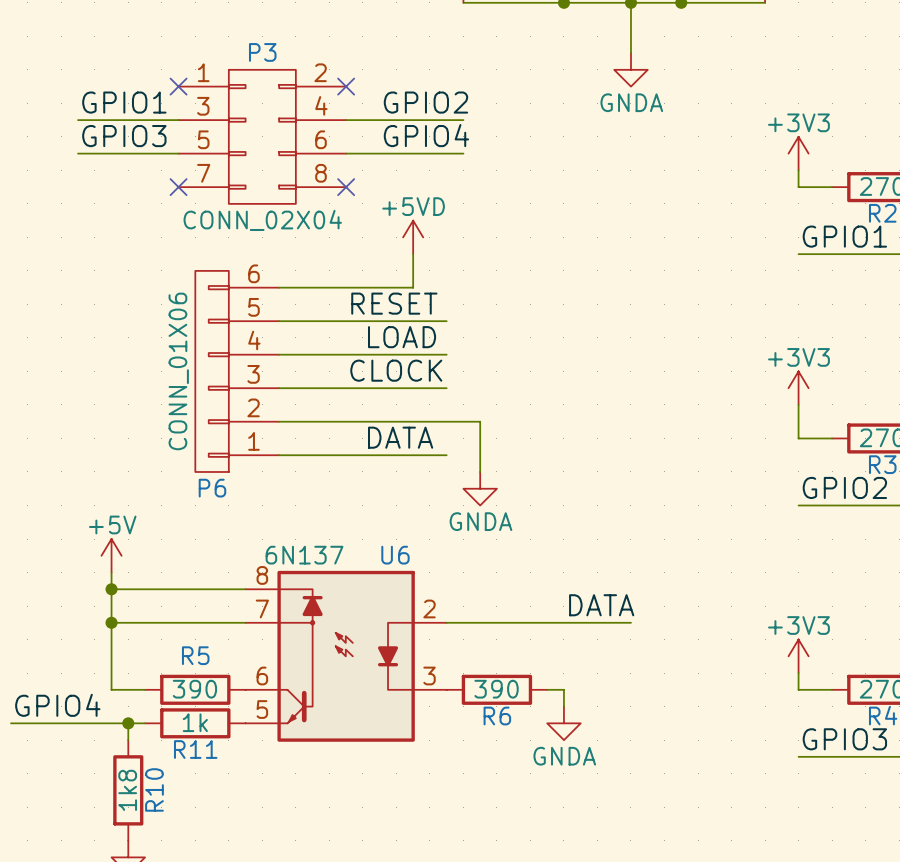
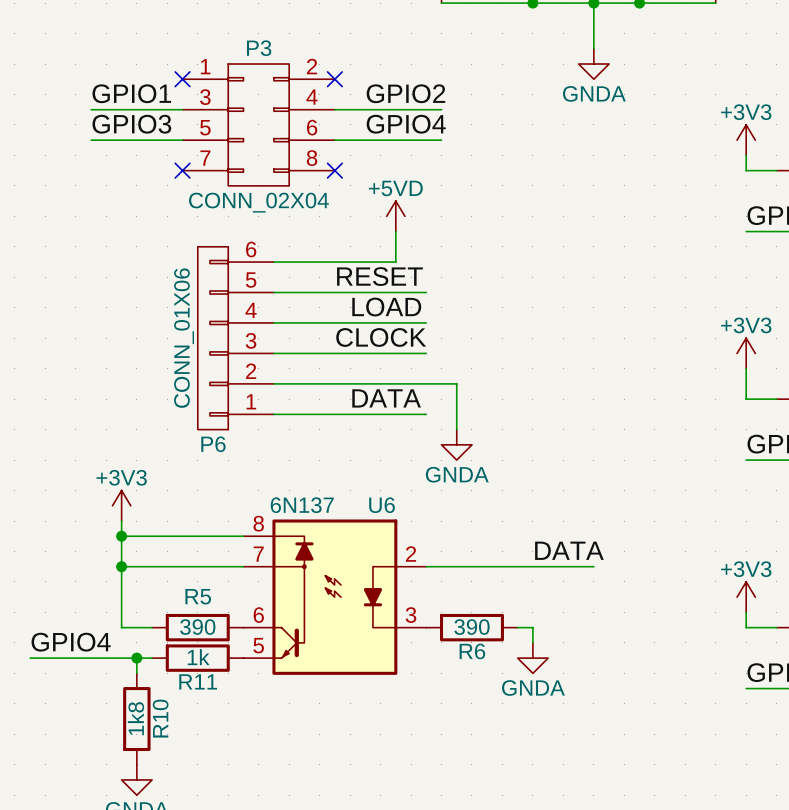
power symbol: +5V (111, 555) -> +3V3 (121, 505)

